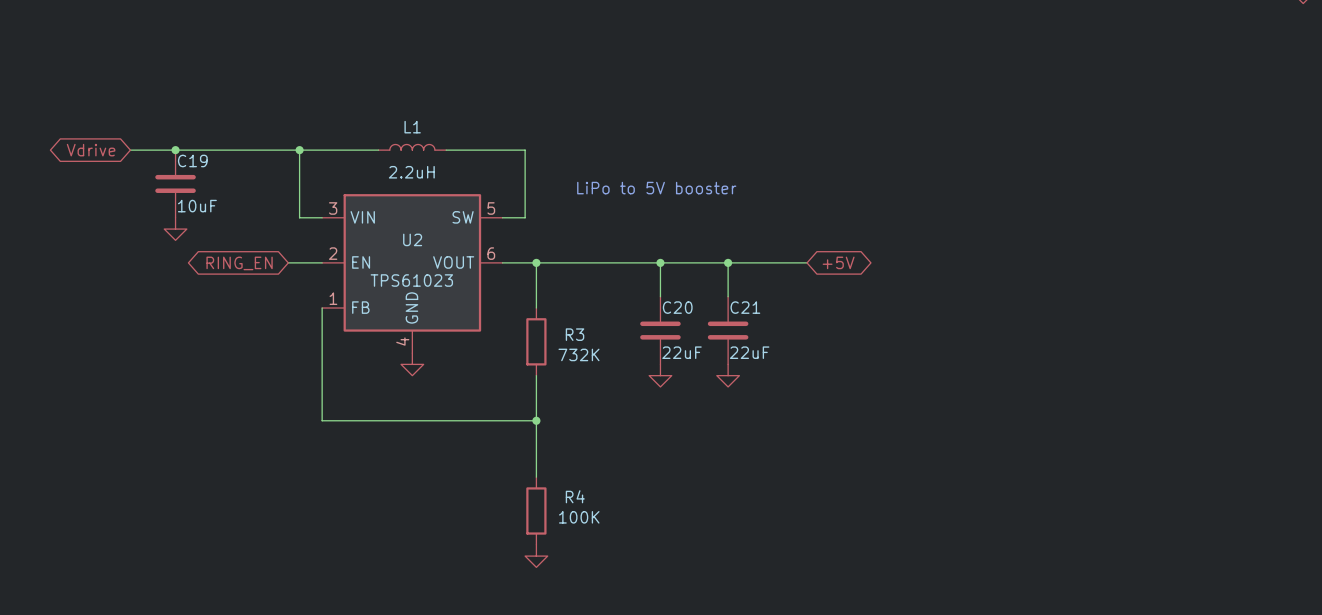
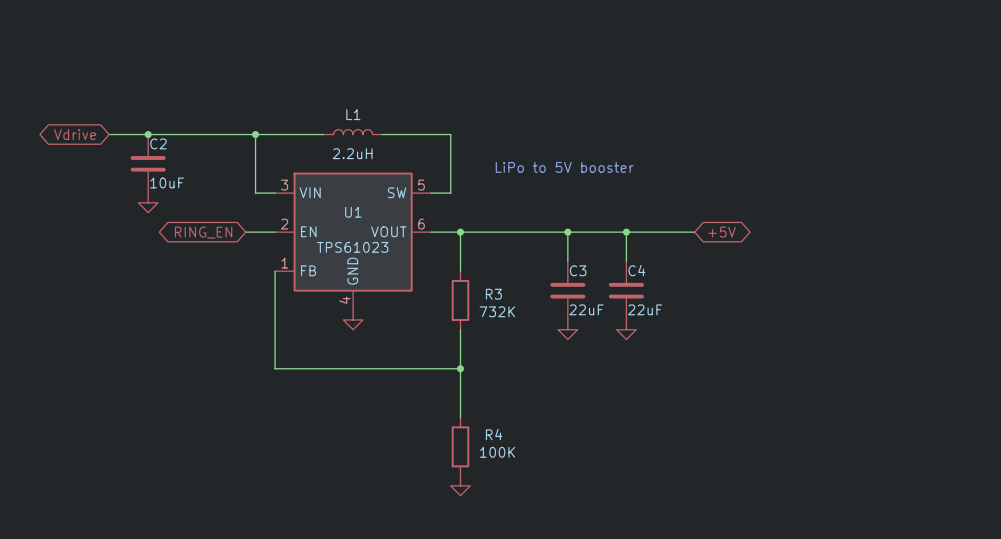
C19 name: C19 (192, 160) -> C2 (158, 143)
U2 name: U2 (412, 239) -> U1 (353, 212)
C20 name: C20 (677, 307) -> C3 (578, 270)
C21 name: C21 (745, 307) -> C4 (636, 270)

